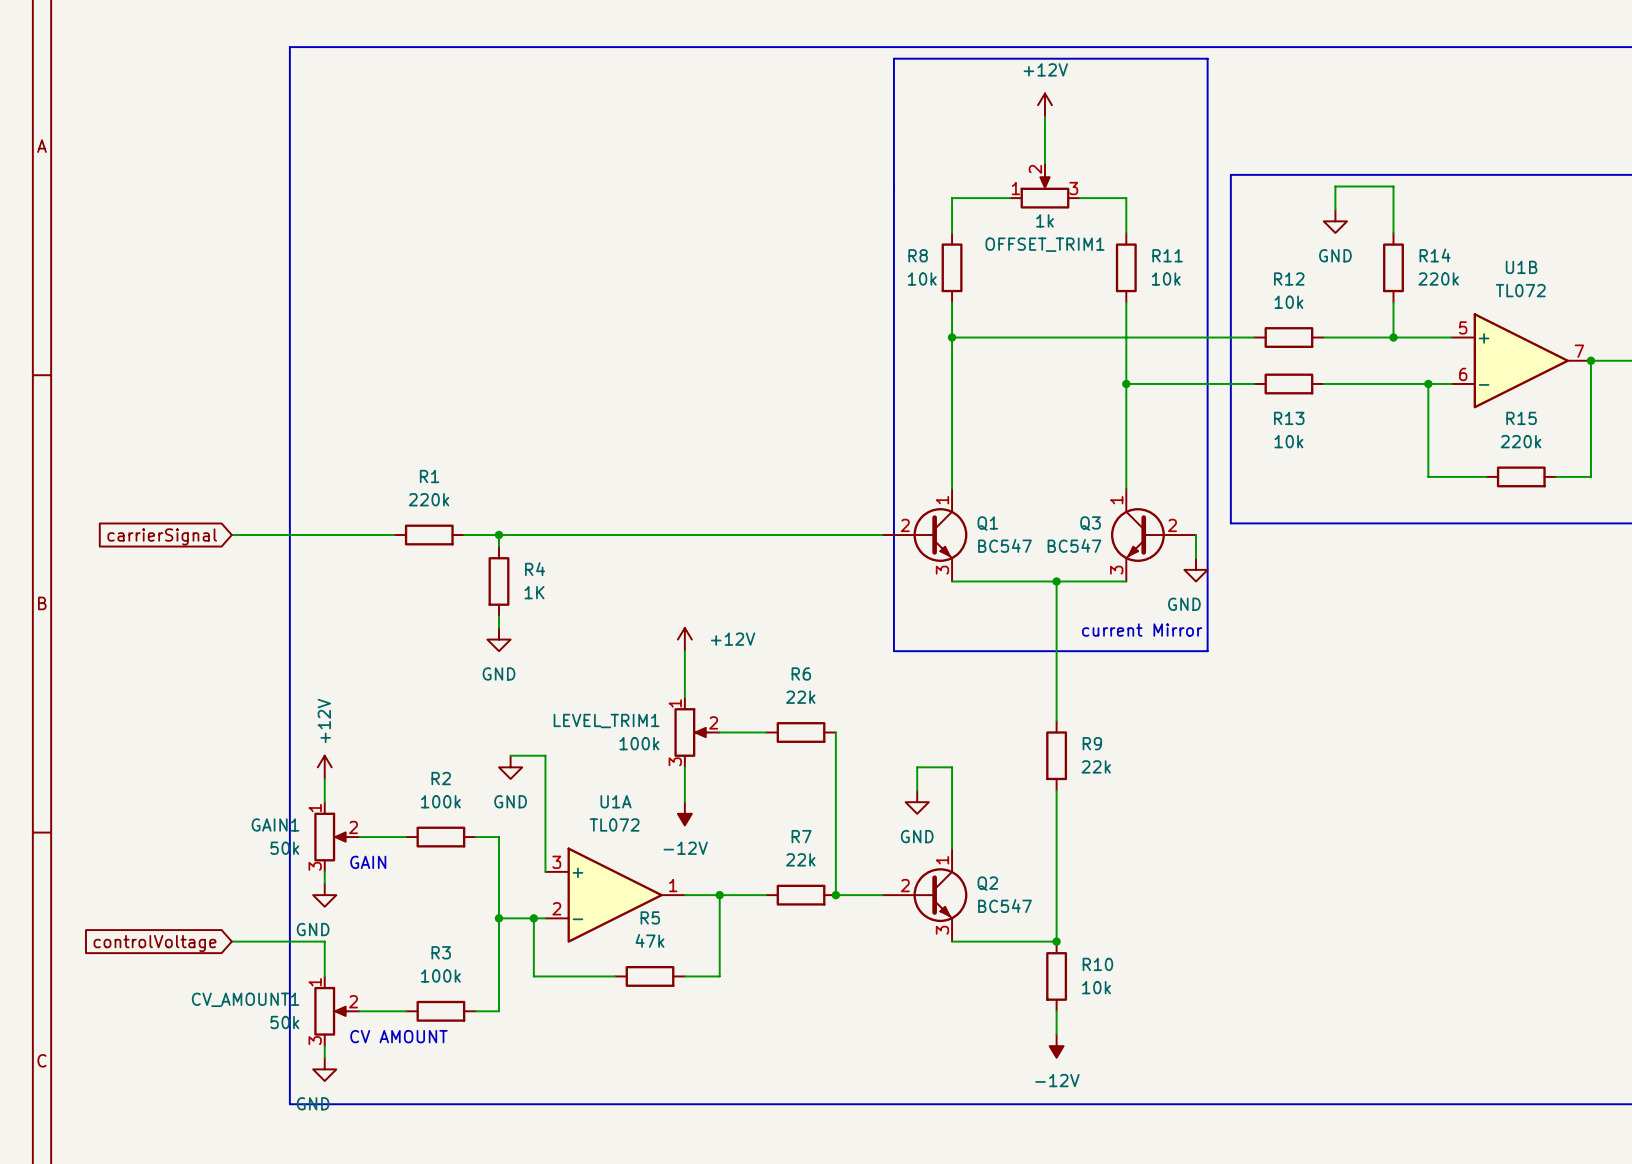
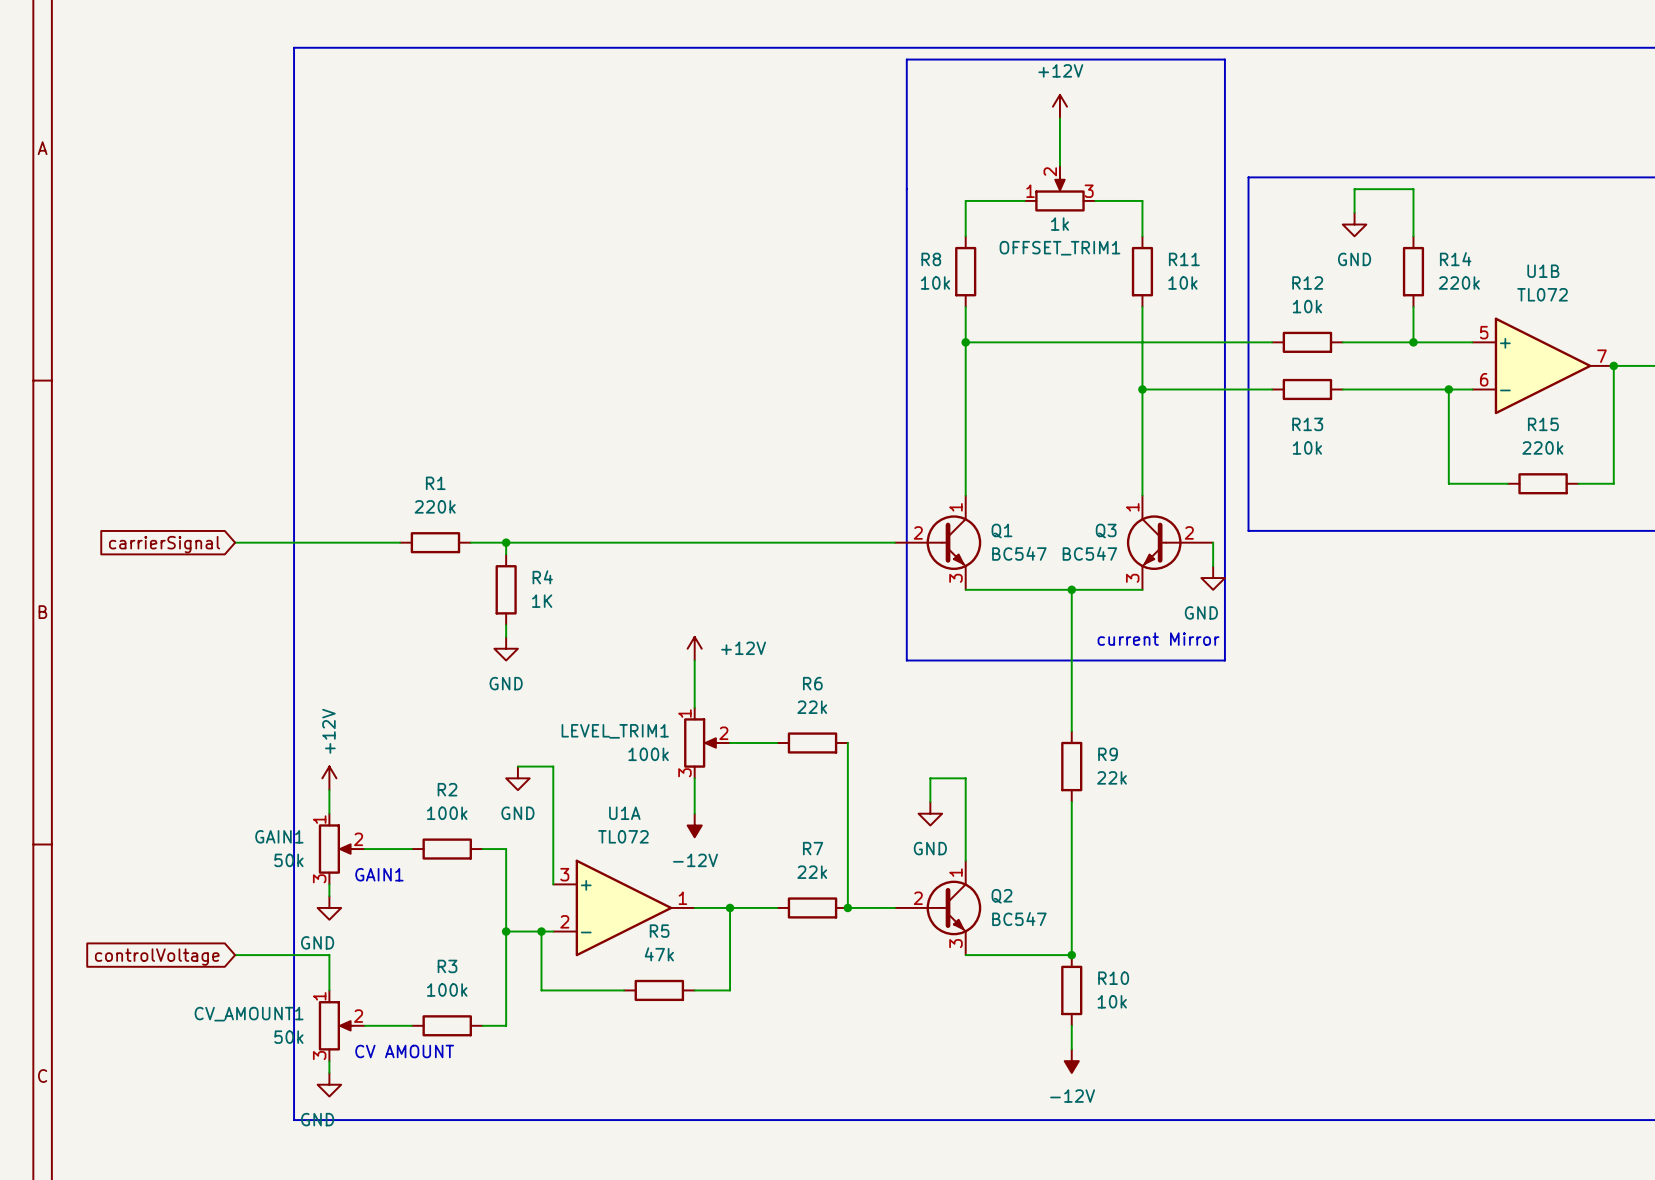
text: GAIN (368, 862) -> GAIN1 (379, 874)

